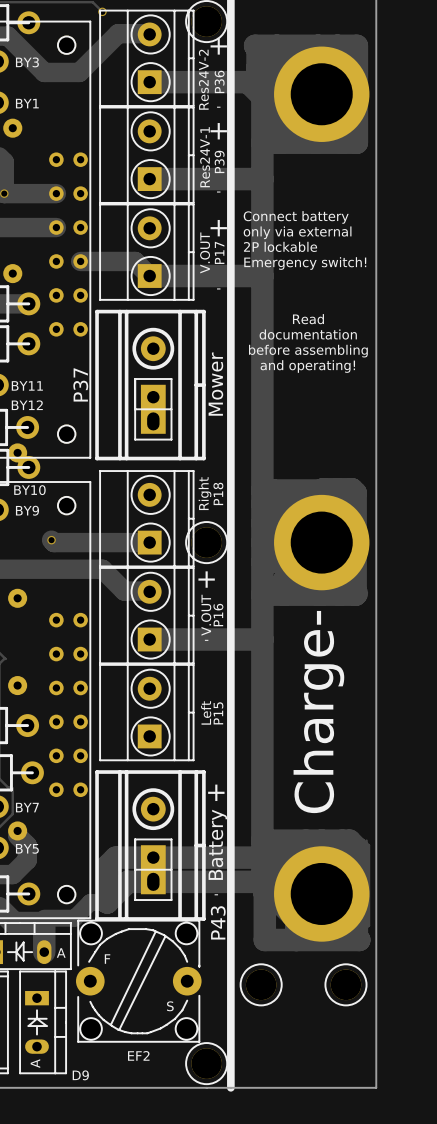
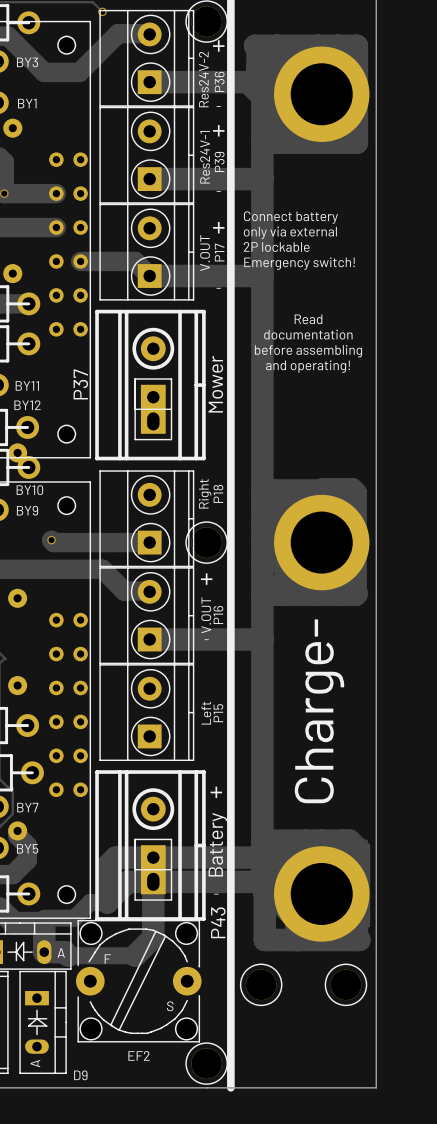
track: none -> (153, 881) (153, 937) (135, 955) (68, 955) (64, 952) (44, 952)

